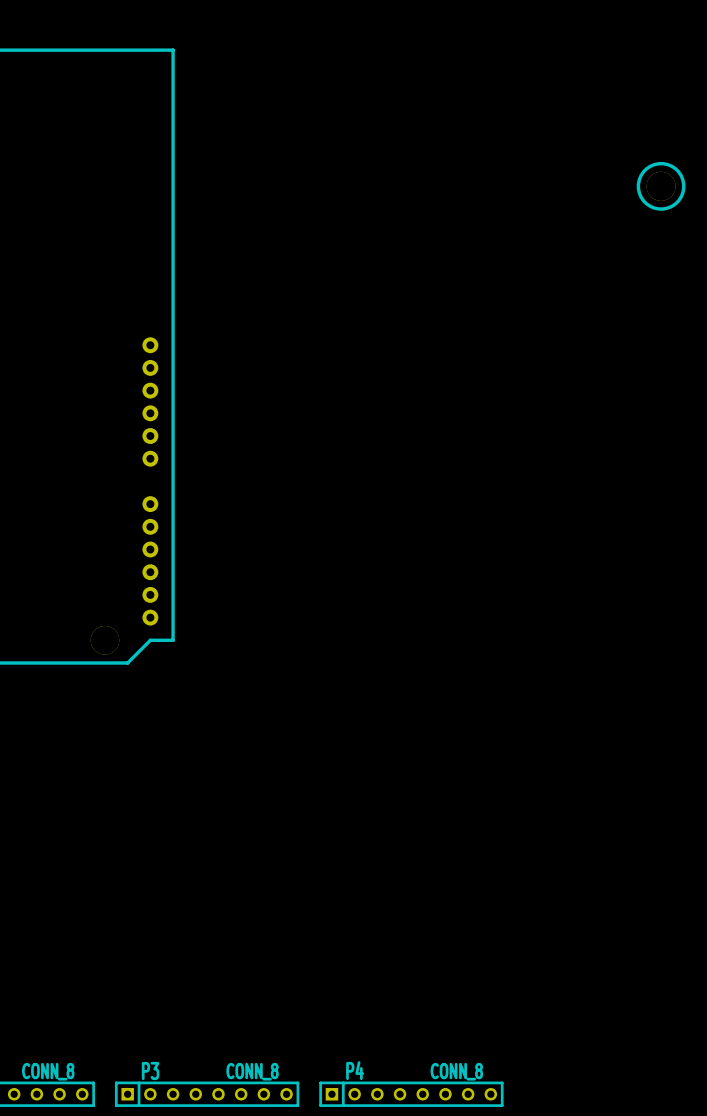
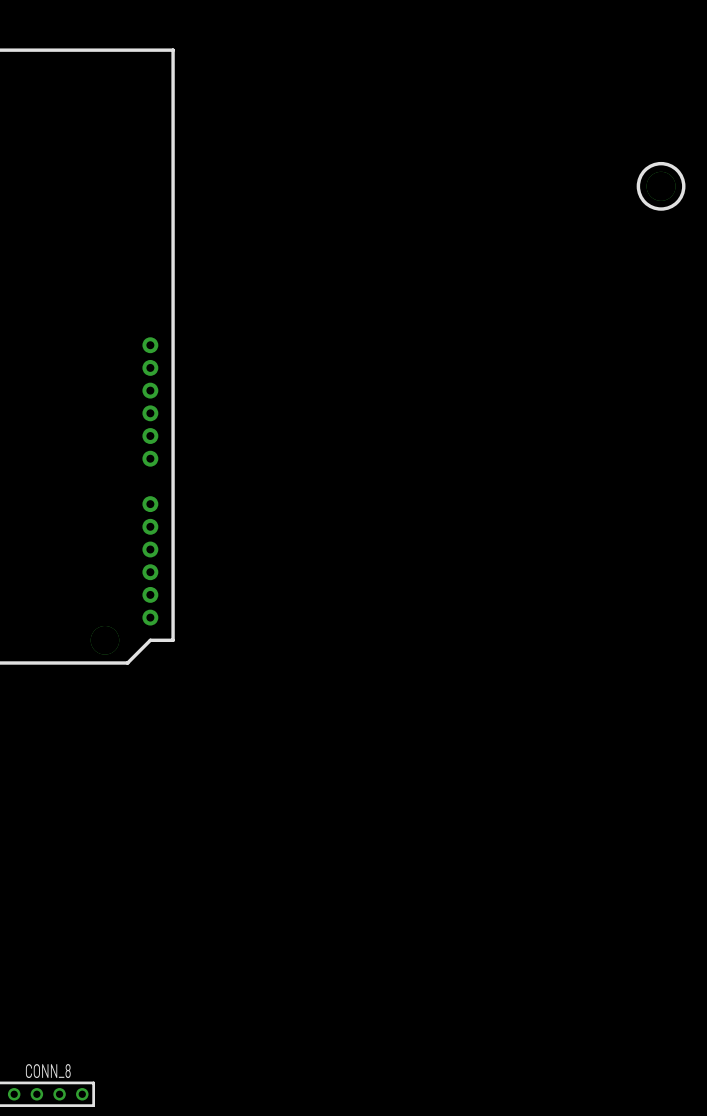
P3: CONN_8 (207, 1094) -> none
P4: CONN_8 (411, 1094) -> none

